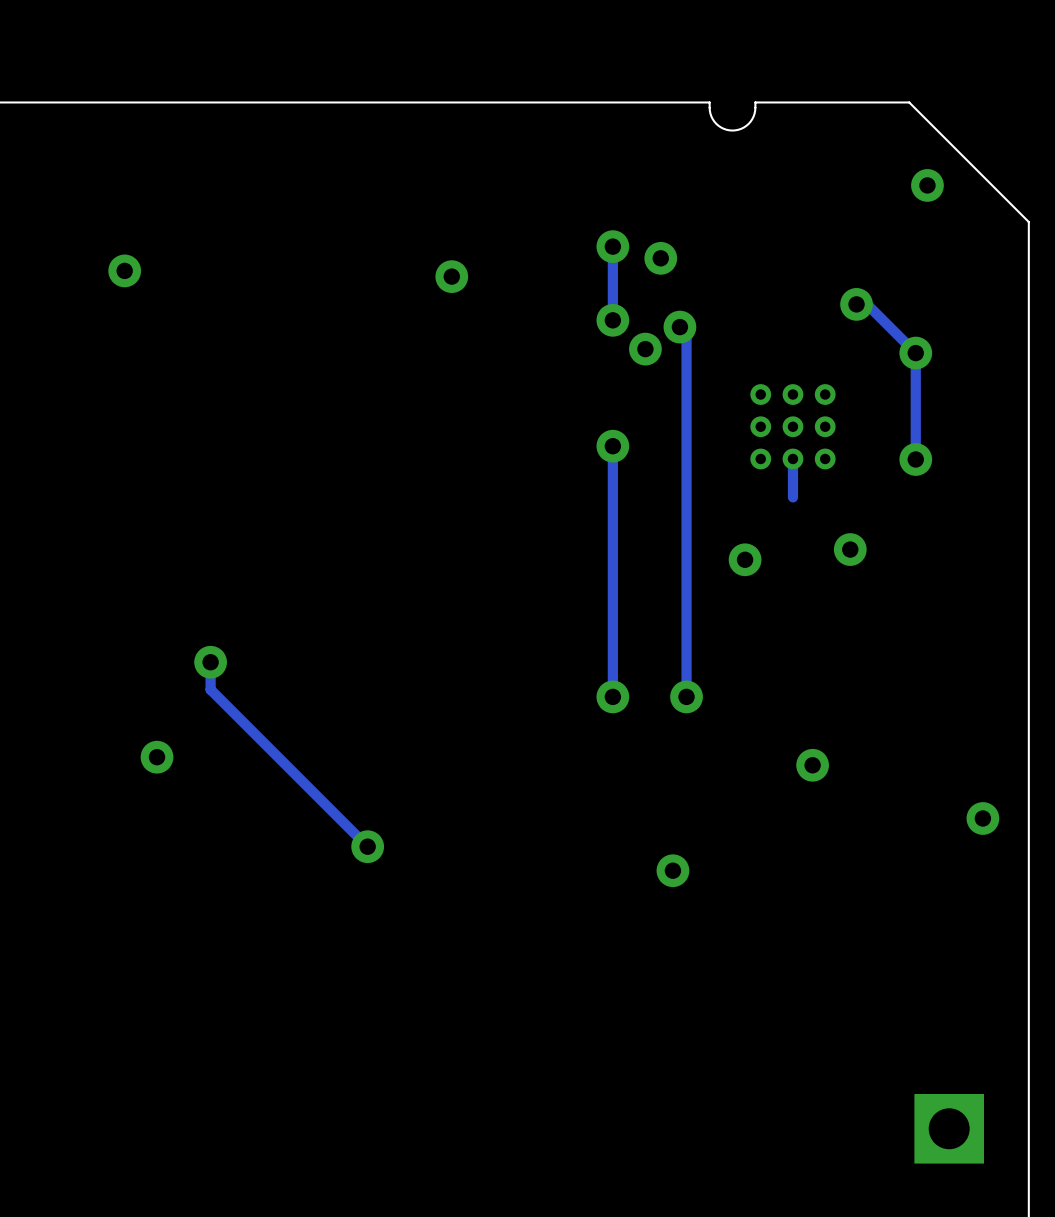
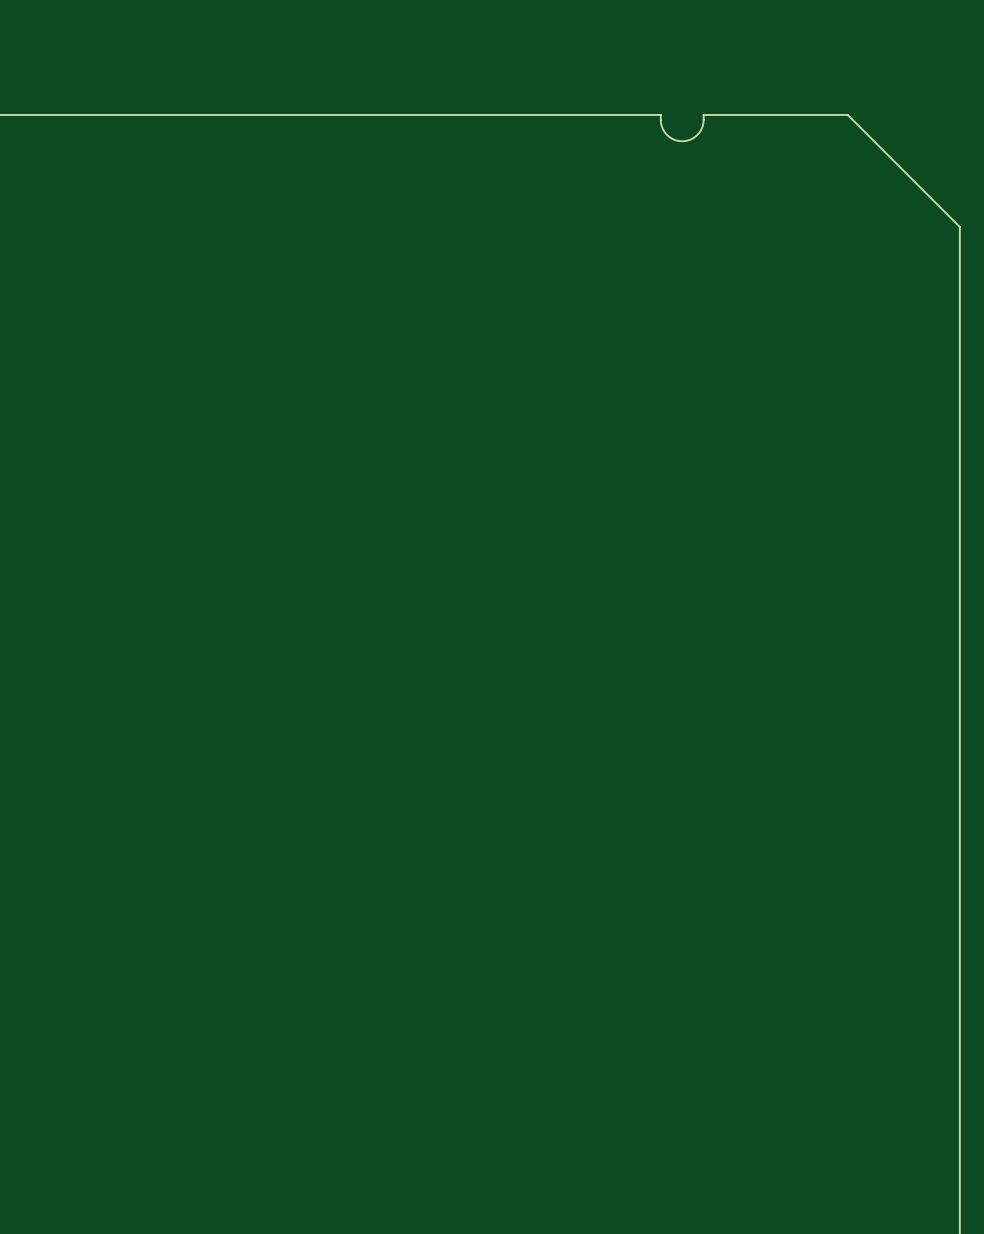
via: (927, 185) -> none
track: (612, 246) (612, 320) -> none
via: (612, 246) -> none
via: (660, 258) -> none
via: (124, 270) -> none
via: (451, 276) -> none
track: (856, 304) (867, 304) (915, 353) (915, 459) -> none
via: (856, 304) -> none
via: (612, 320) -> none
track: (679, 327) (686, 333) (686, 696) -> none
via: (679, 327) -> none
via: (645, 349) -> none
via: (915, 353) -> none
part: (792, 426) -> none
track: (612, 446) (612, 696) -> none
via: (612, 446) -> none
track: (792, 458) (792, 497) -> none
via: (915, 459) -> none
via: (850, 549) -> none
via: (745, 559) -> none
track: (210, 662) (210, 689) (367, 846) -> none
via: (210, 662) -> none
via: (612, 696) -> none
via: (686, 696) -> none
via: (157, 757) -> none
via: (812, 765) -> none
via: (982, 818) -> none
via: (367, 846) -> none
via: (672, 870) -> none
part: (949, 1128) -> none

